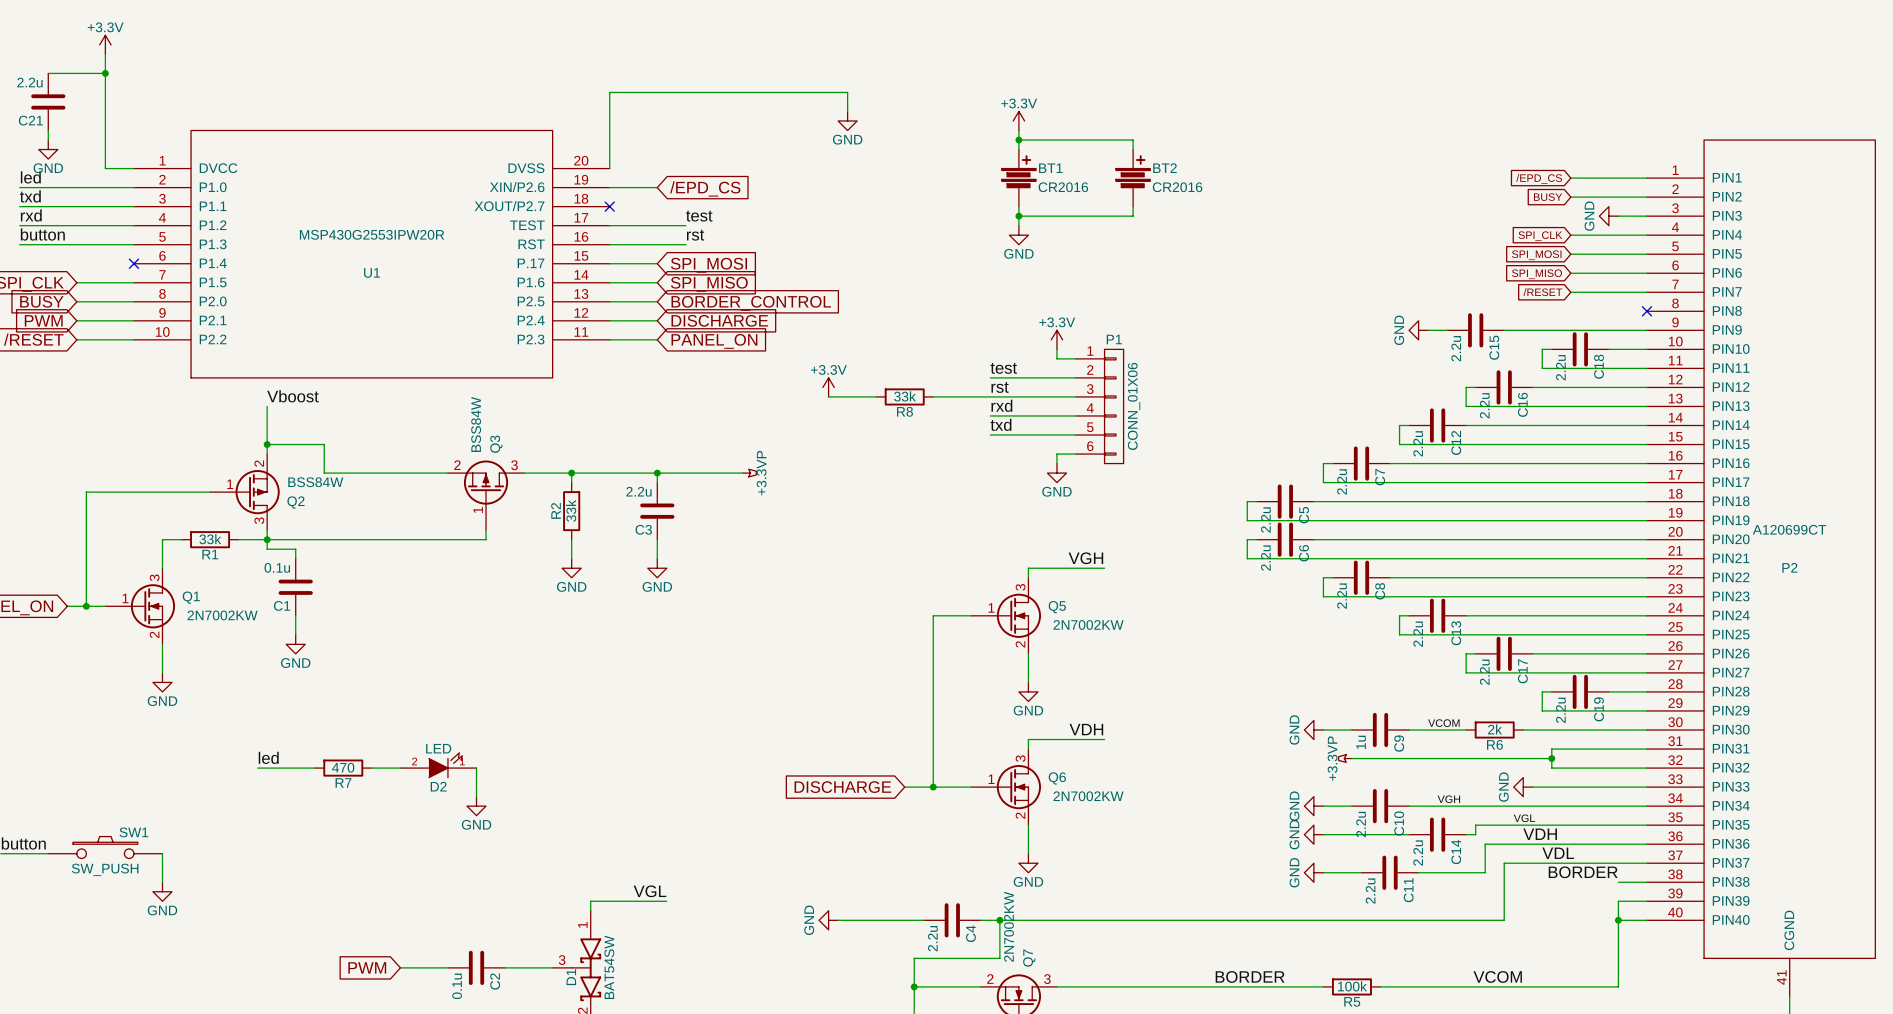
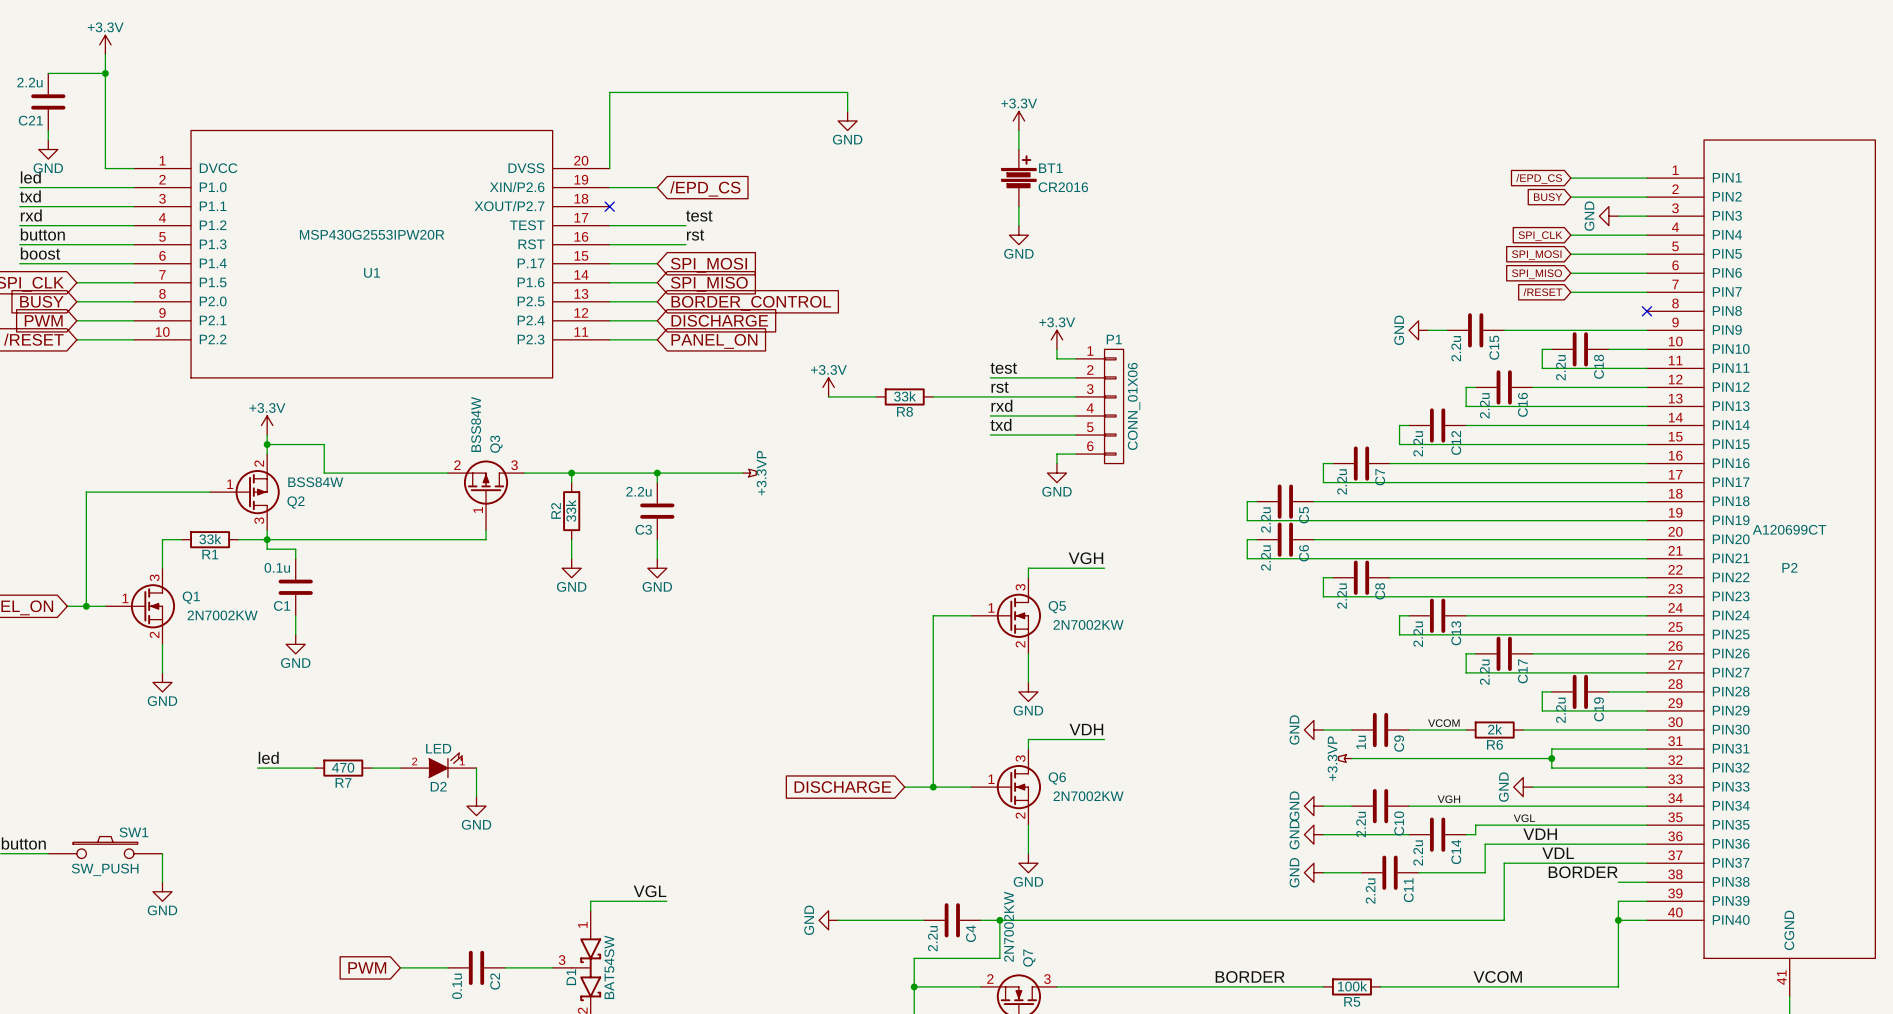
wire: (1018, 140) (1133, 140) (1133, 149) -> none
junction: (1018, 140) -> none
BT2: CR2016 (1133, 178) -> none
wire: (1133, 206) (1133, 216) (1018, 216) -> none
junction: (1018, 216) -> none
label: none -> boost (40, 253)
wire: none -> (19, 263) (133, 263)
no-connect mark: (133, 263) -> none
label: Vboost (292, 396) -> none
power symbol: none -> +3.3V (267, 425)

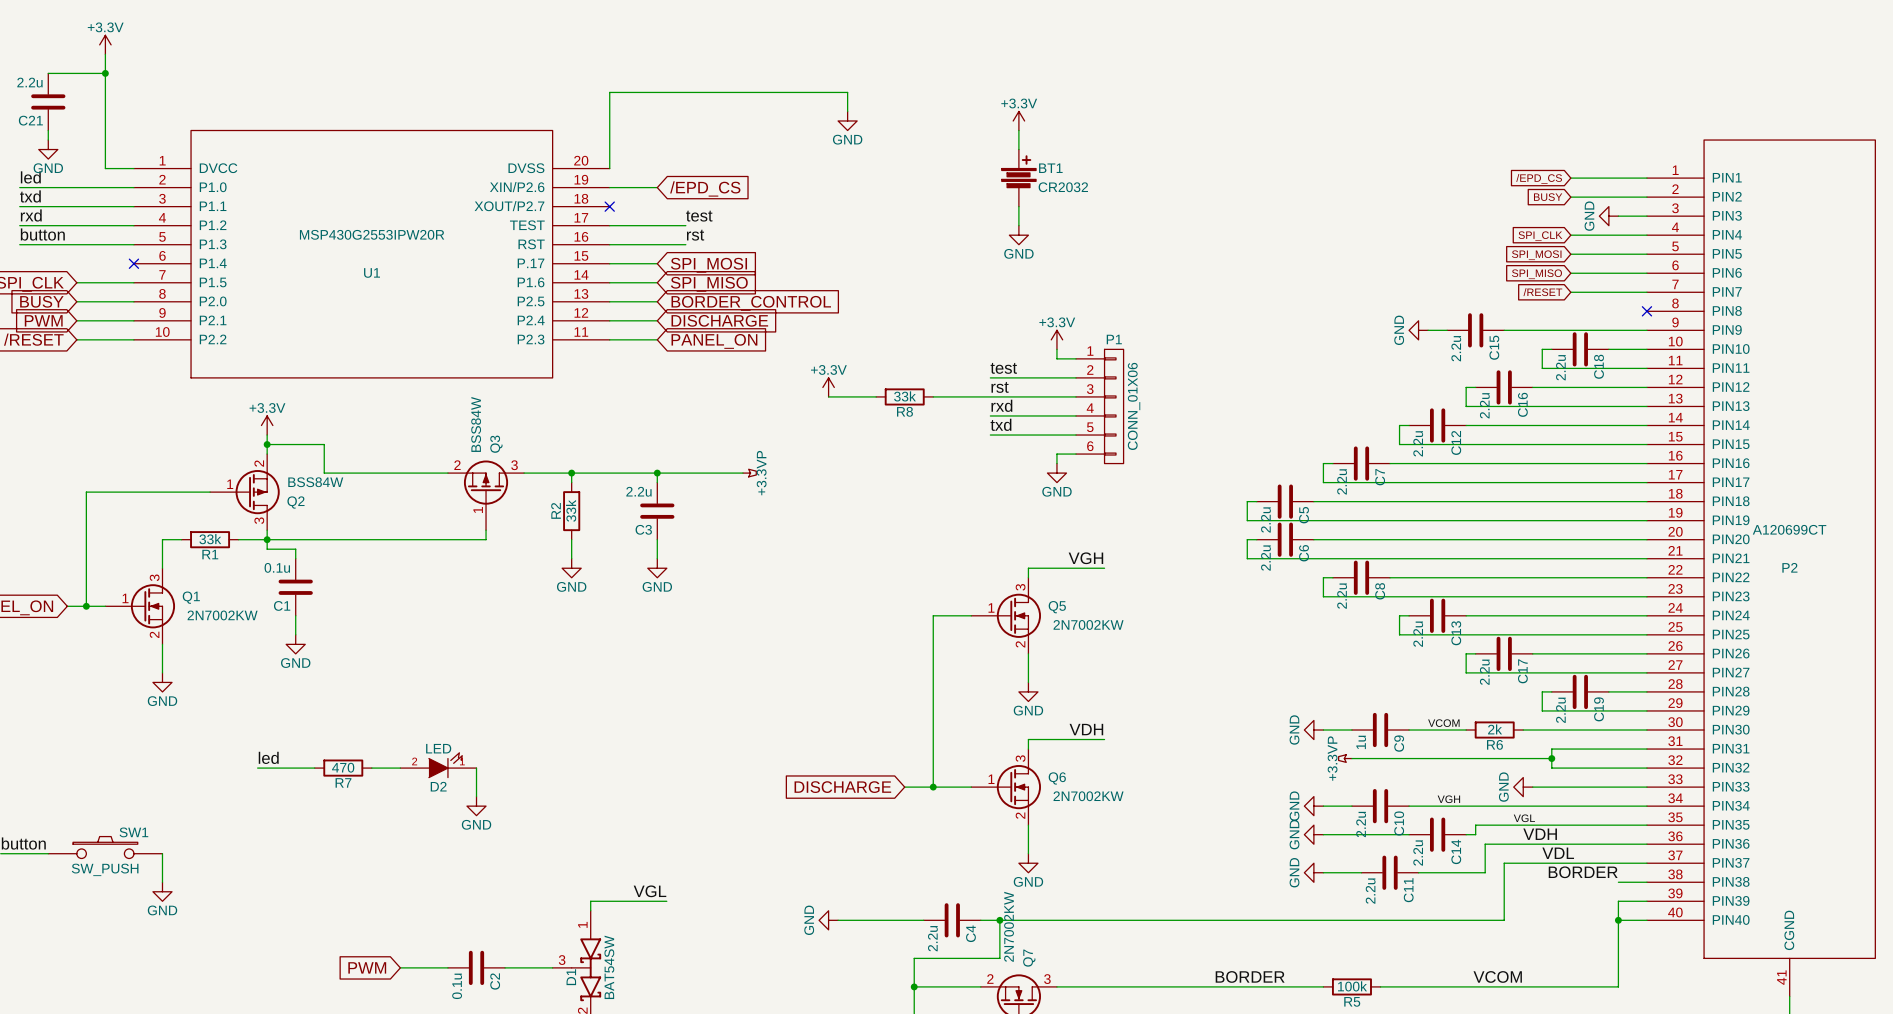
BT1 value: CR2016 (1063, 187) -> CR2032 (1063, 187)
label: boost (40, 253) -> none
wire: (19, 263) (133, 263) -> none
no-connect mark: none -> (133, 263)

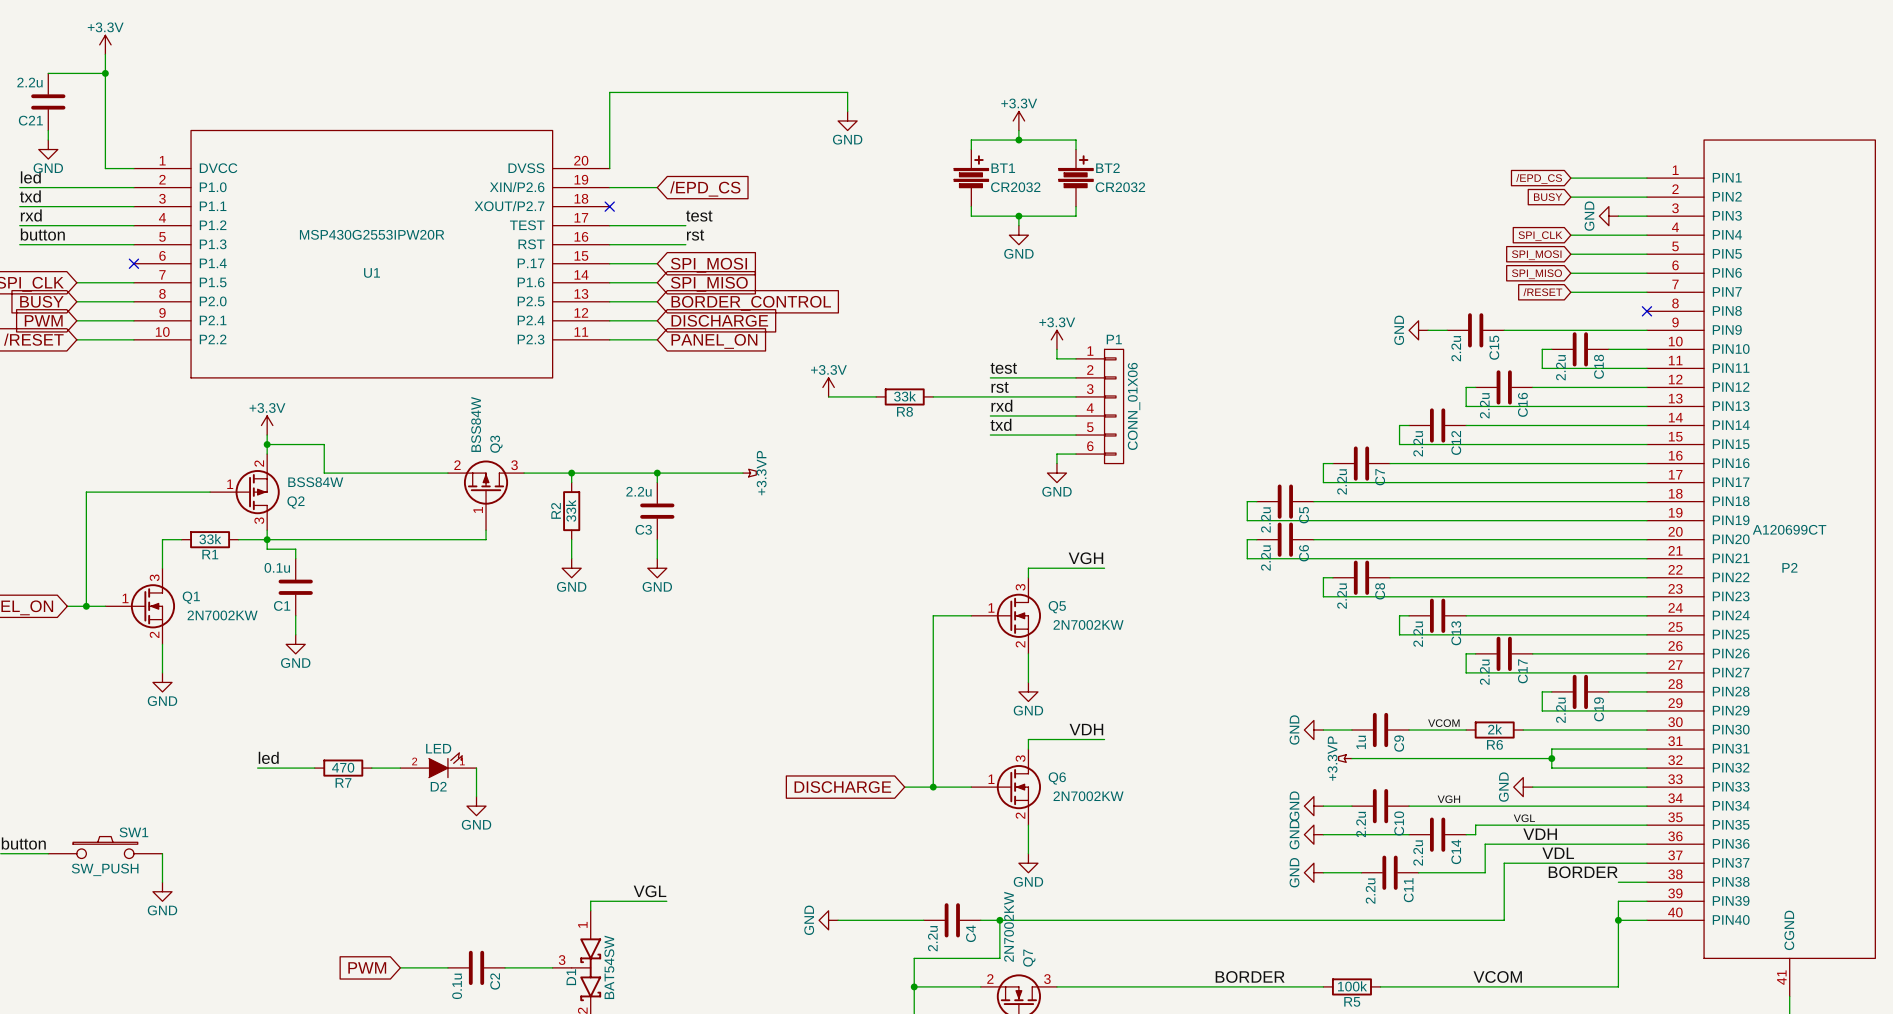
wire: (1018, 140) (1018, 149) -> none
junction: none -> (1018, 140)
wire: none -> (971, 149) (971, 140) (1076, 140) (1076, 149)
BT1 position: (1018, 178) -> (971, 178)
BT2: none -> CR2032 (1076, 178)
wire: none -> (971, 206) (971, 216) (1076, 216) (1076, 206)
wire: (1018, 206) (1018, 216) -> none
junction: none -> (1018, 216)

